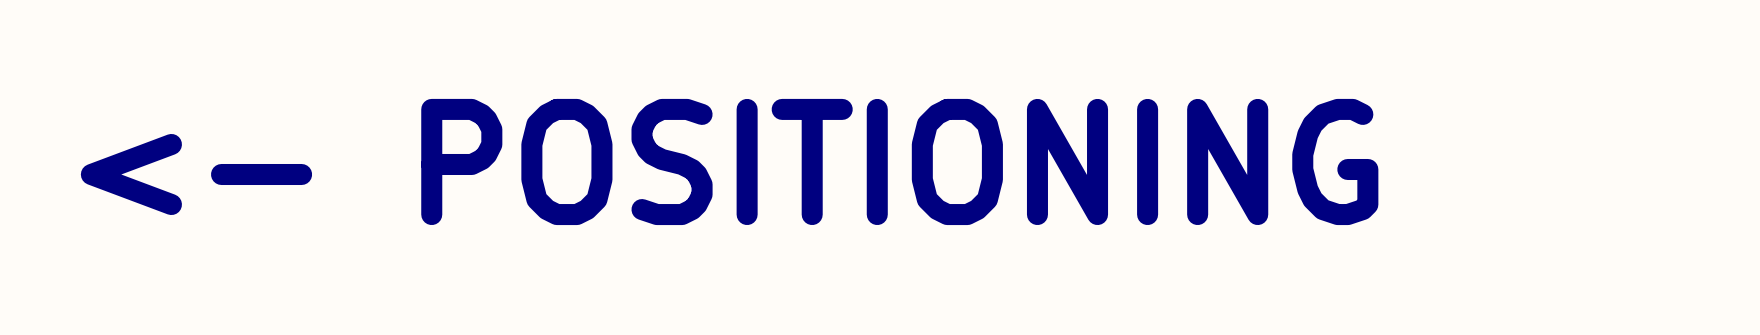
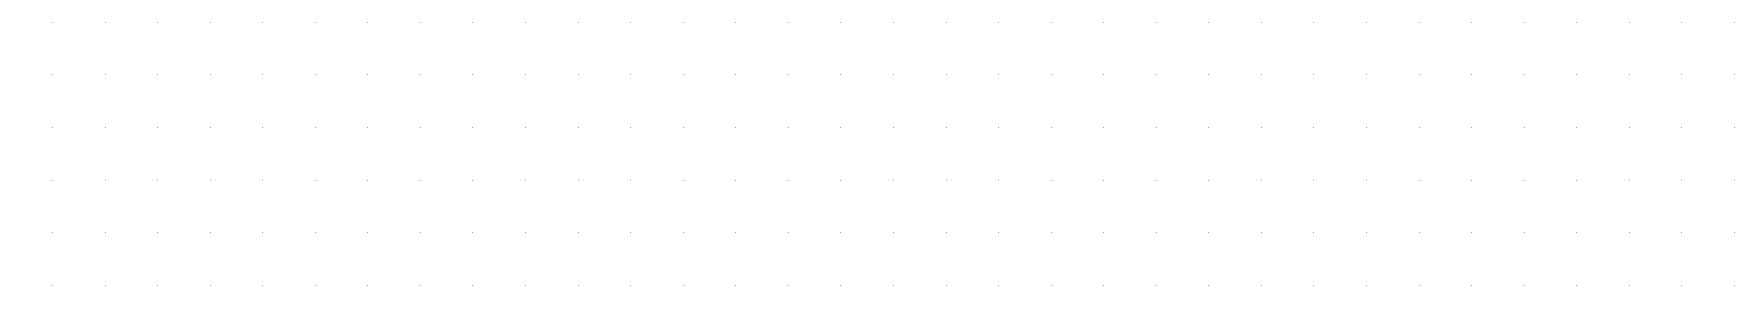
text: <- POSITIONING (729, 161) -> none

